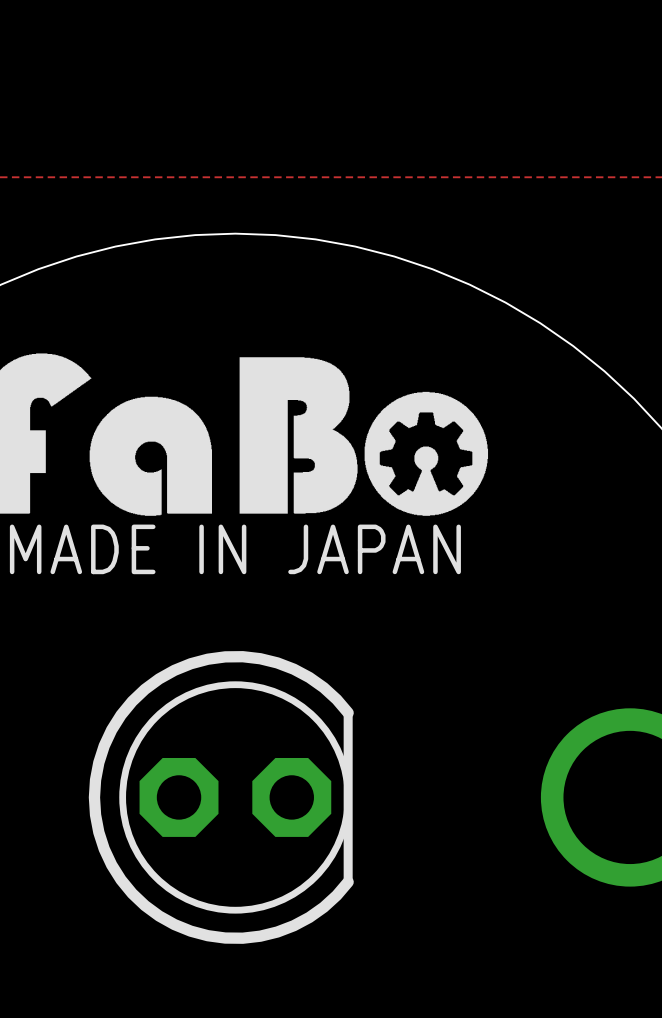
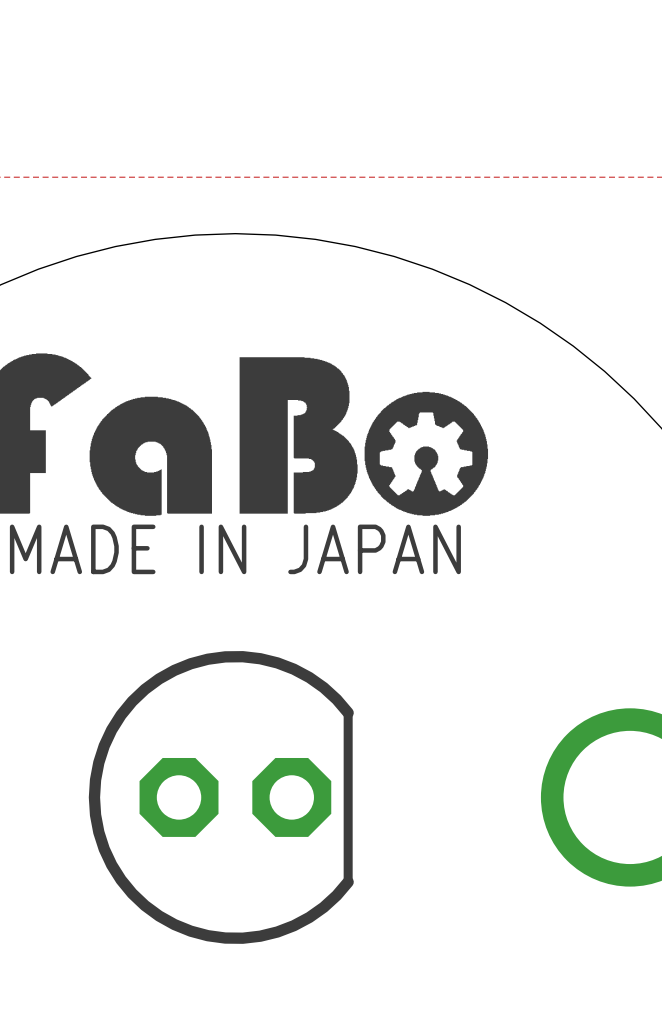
part footprint: [88, 651, 354, 944] -> [88, 651, 354, 944]

